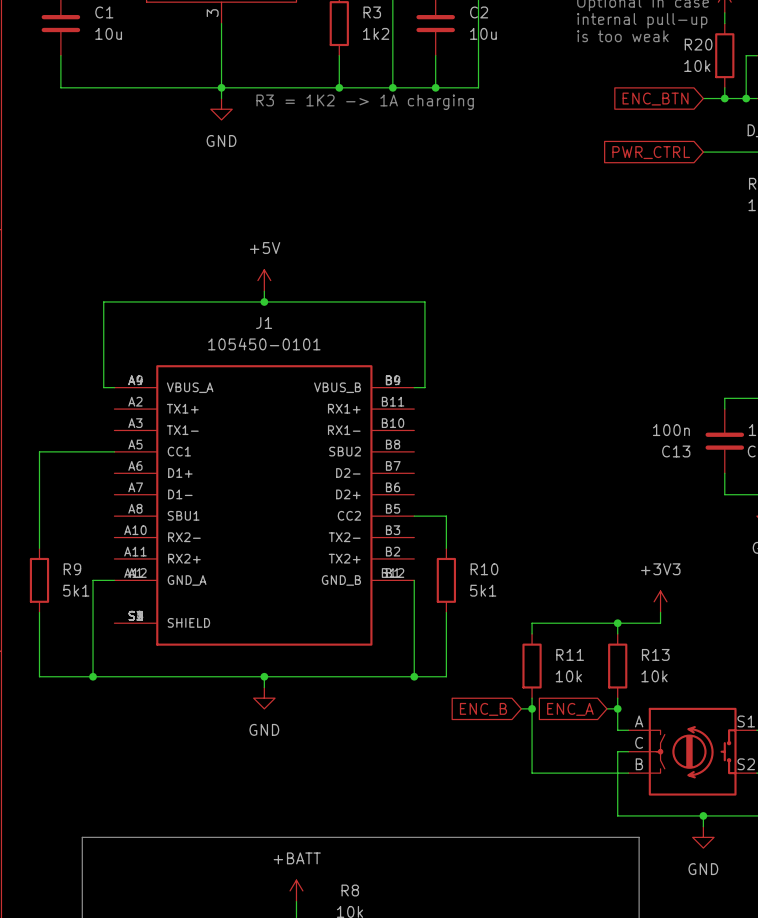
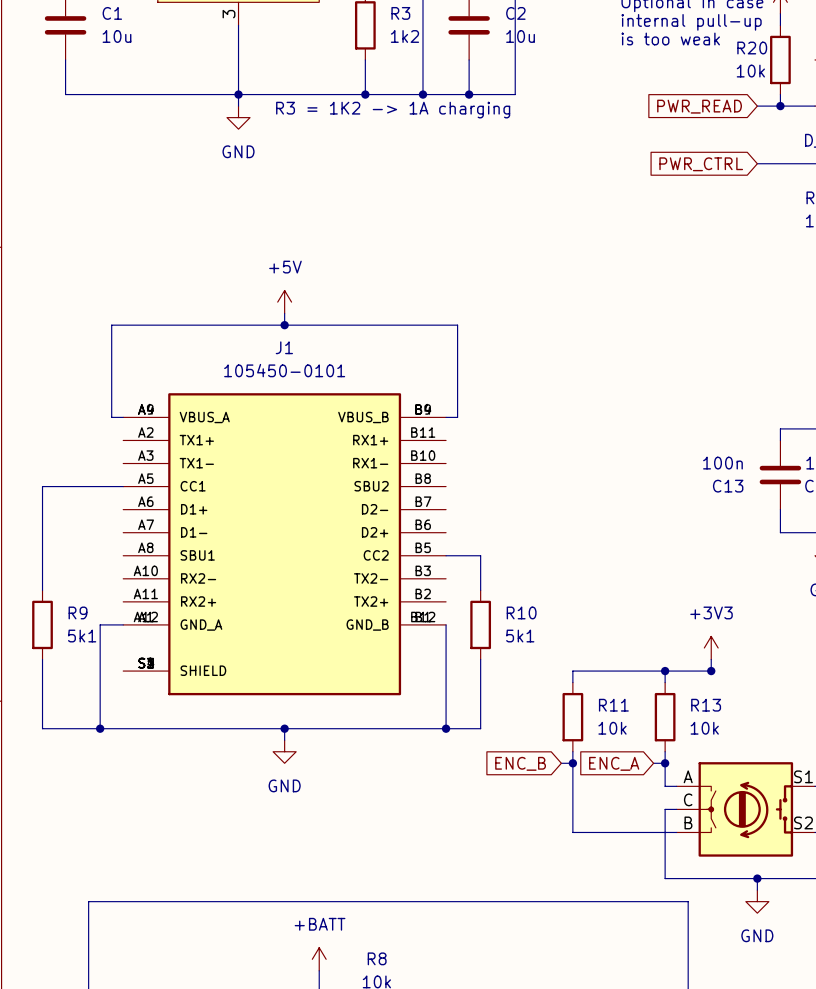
wire: (756, 55) (746, 55) (746, 98) -> none
junction: (746, 98) -> none
global label: ENC_BTN (655, 99) -> PWR_READ (699, 106)
junction: none -> (711, 671)

